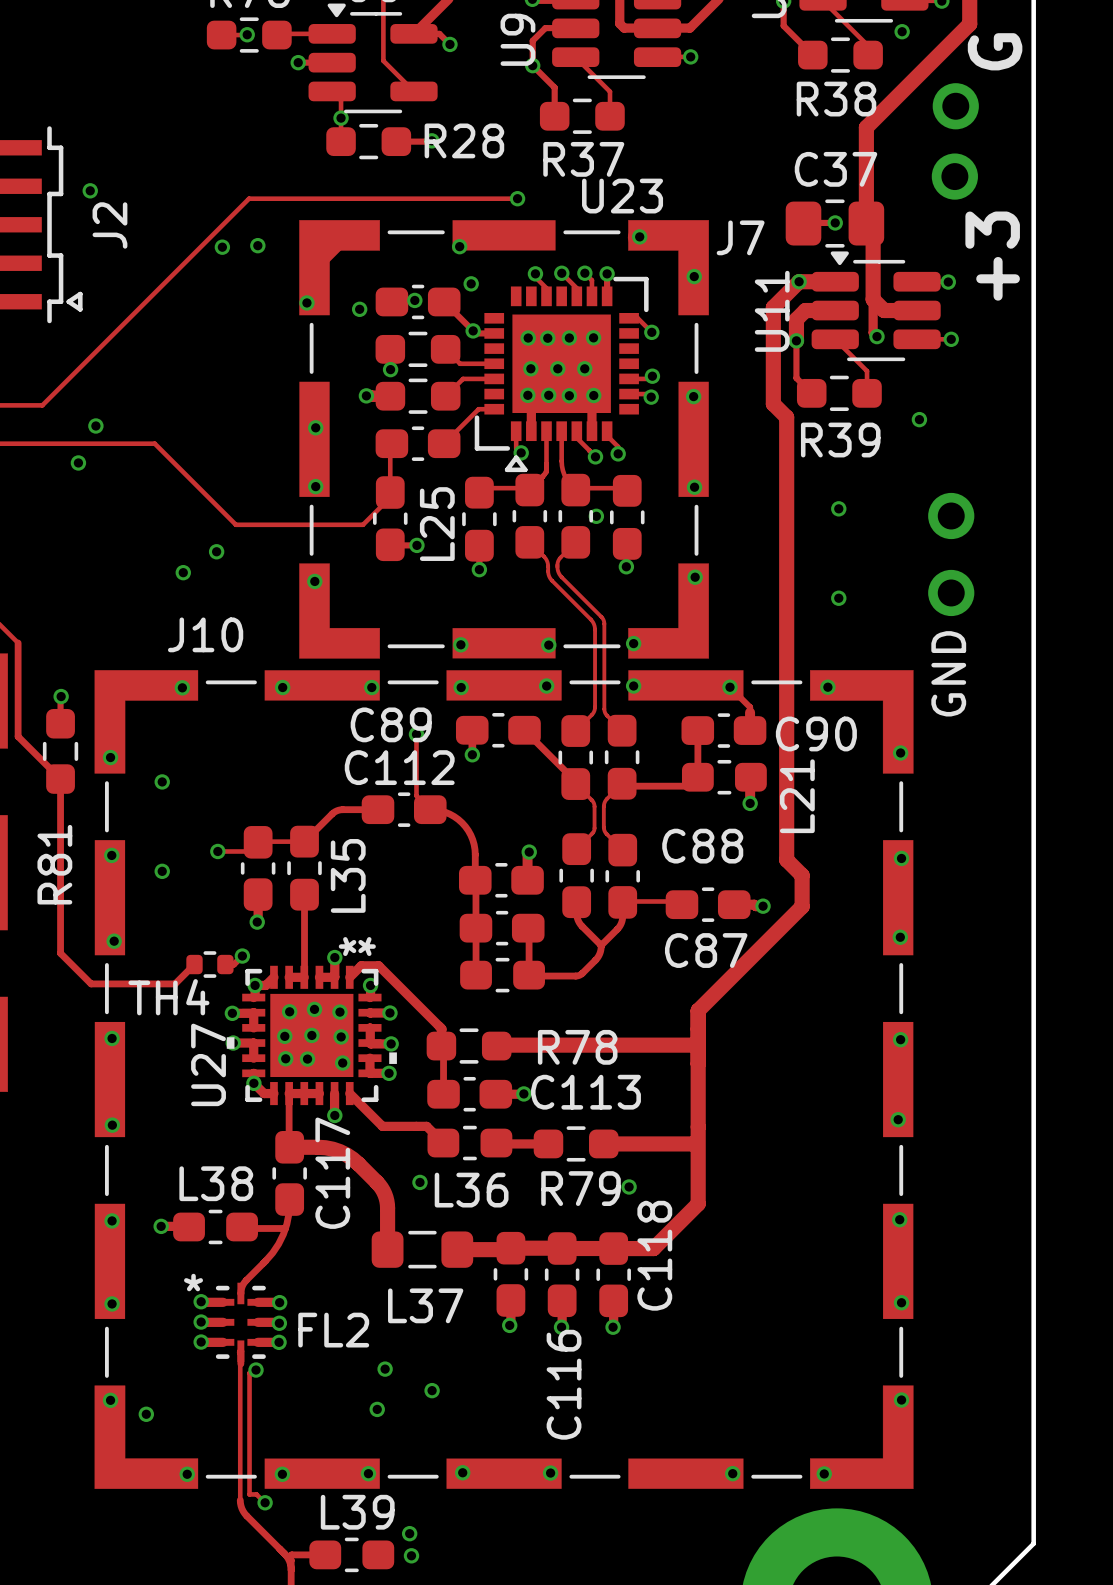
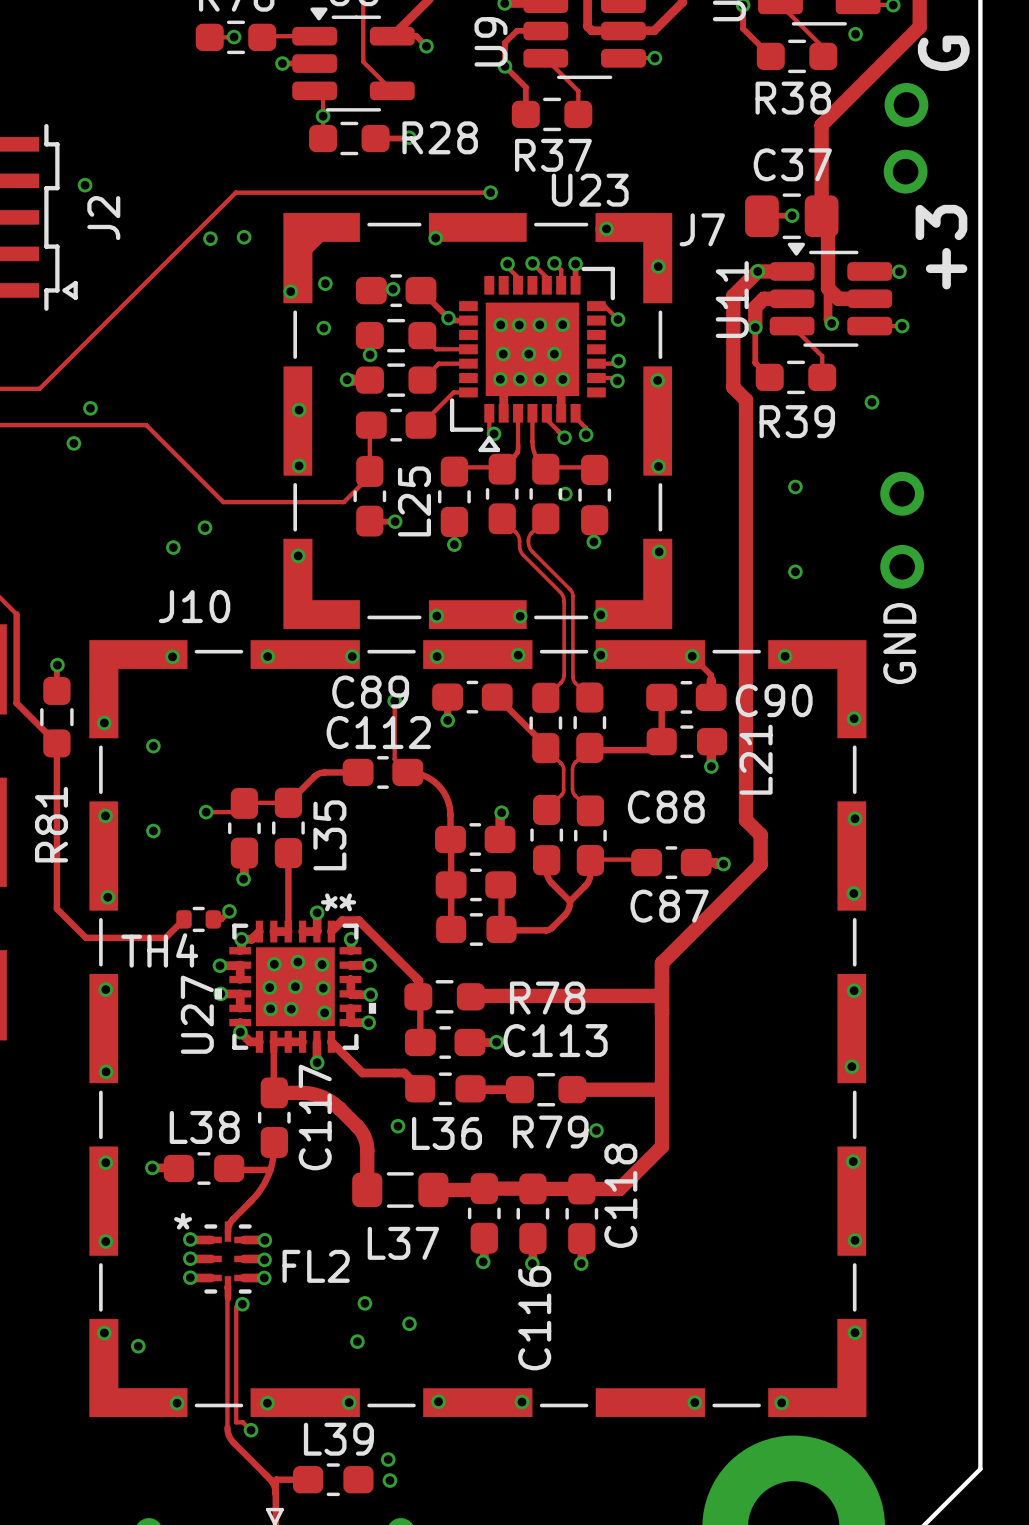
via: (471, 283) -> none
via: none -> (325, 283)
via: (359, 309) -> none
via: none -> (323, 328)

